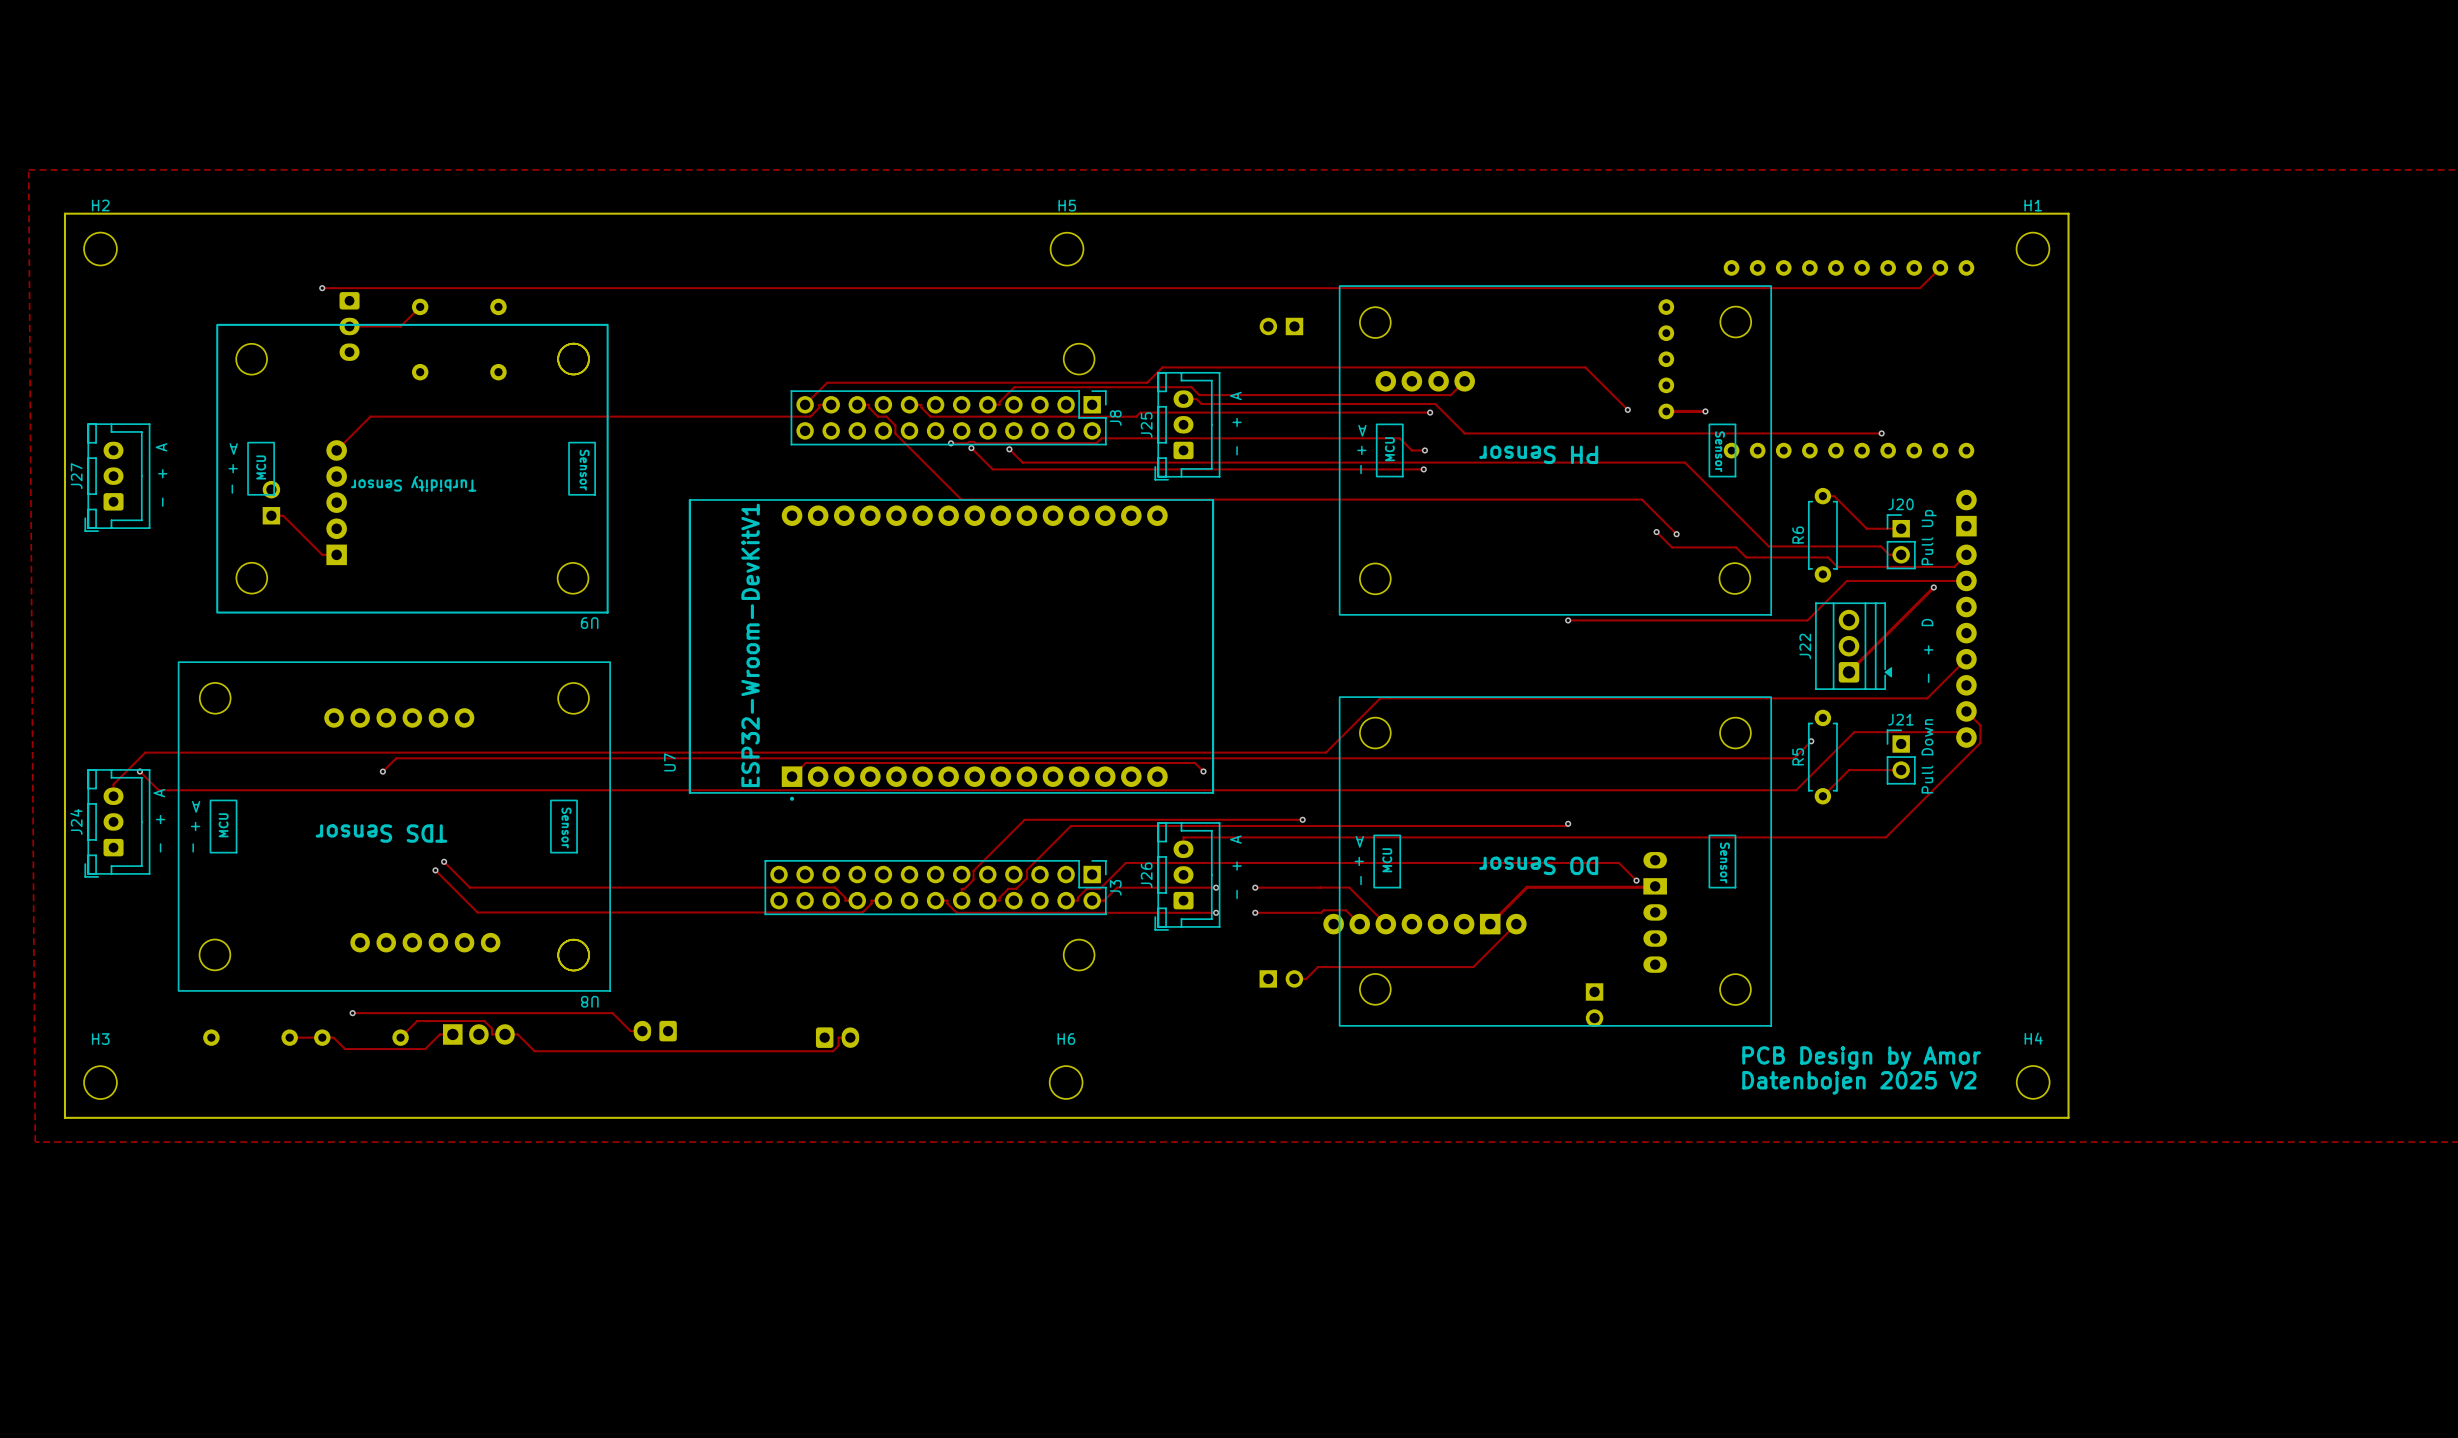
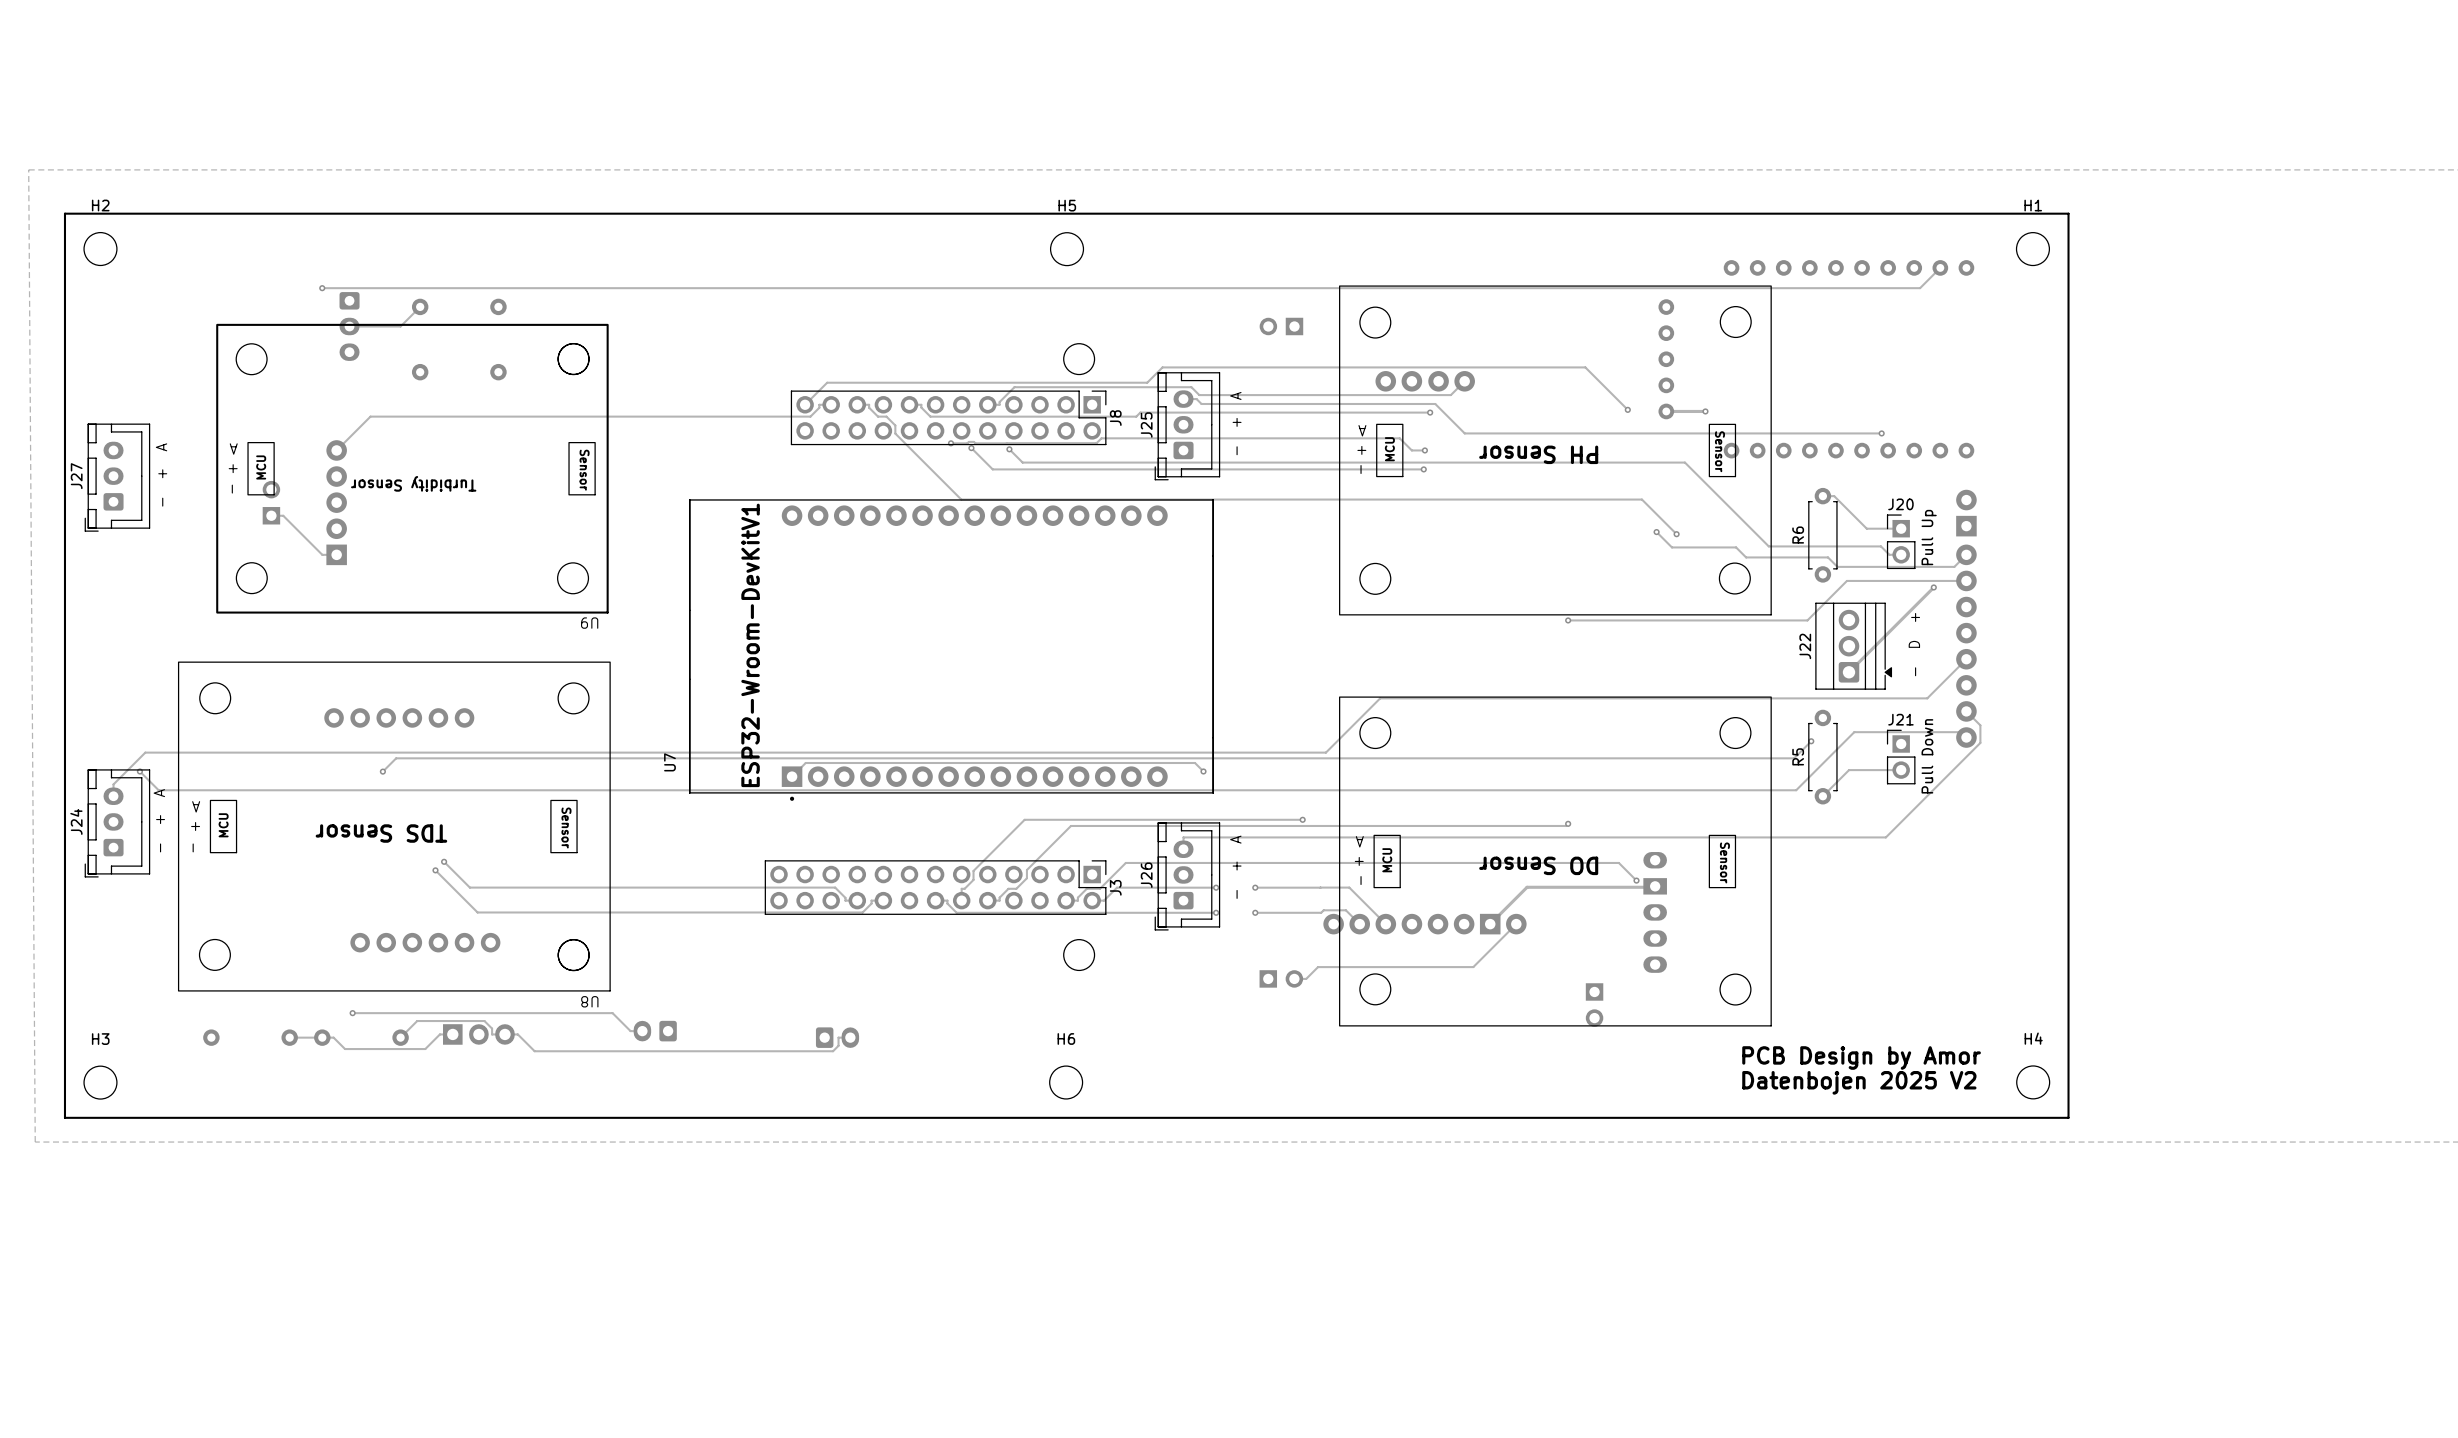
text: - + D (1927, 650) -> - D + (1914, 644)

